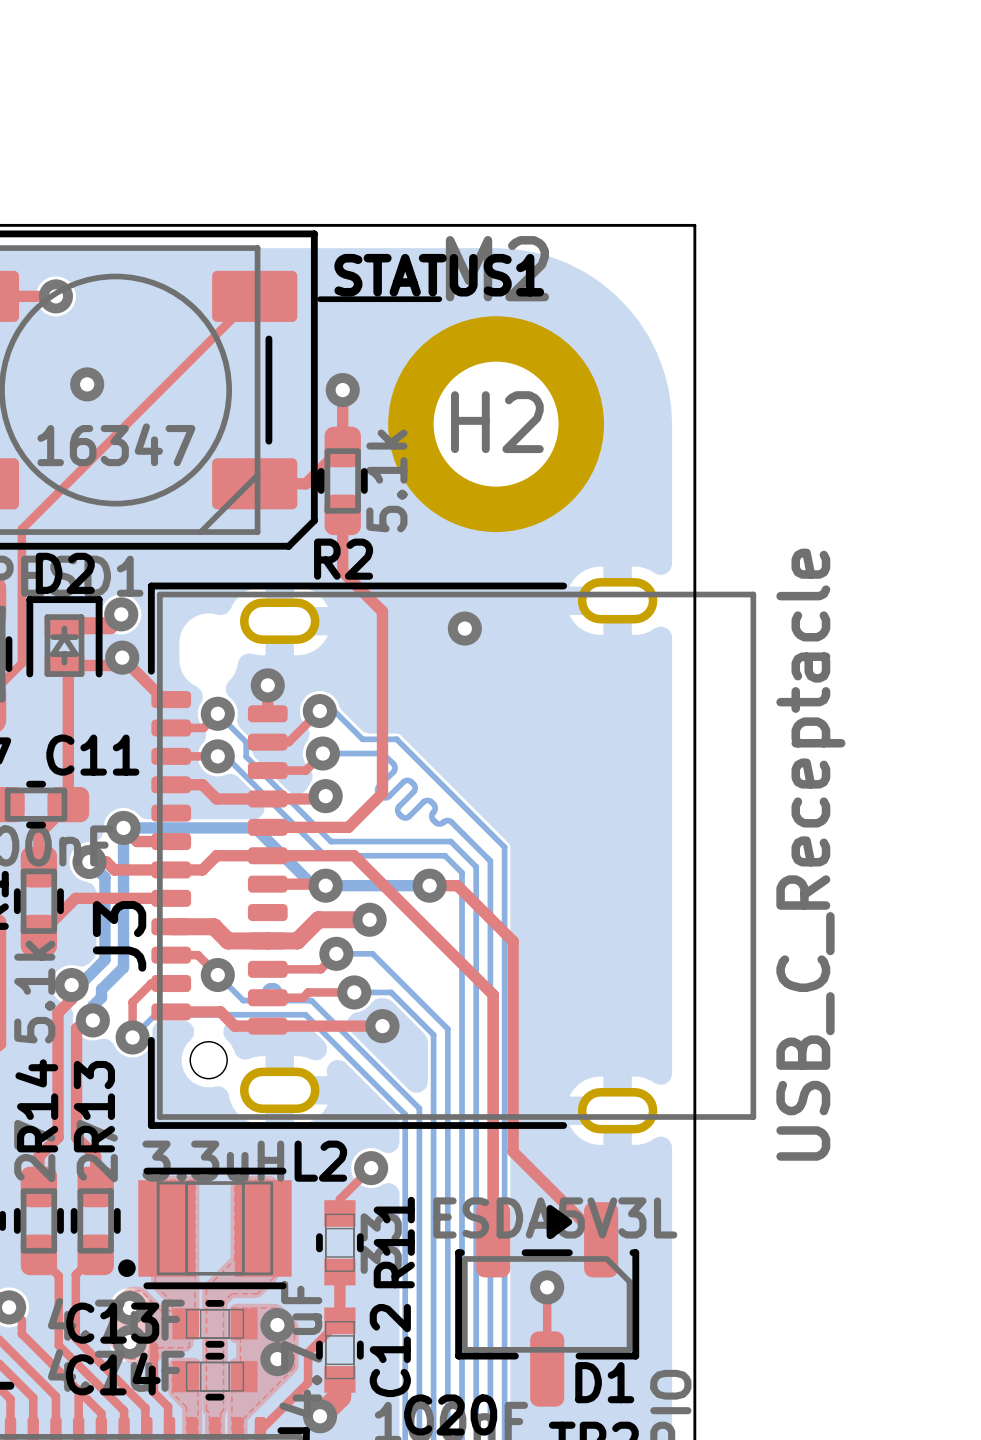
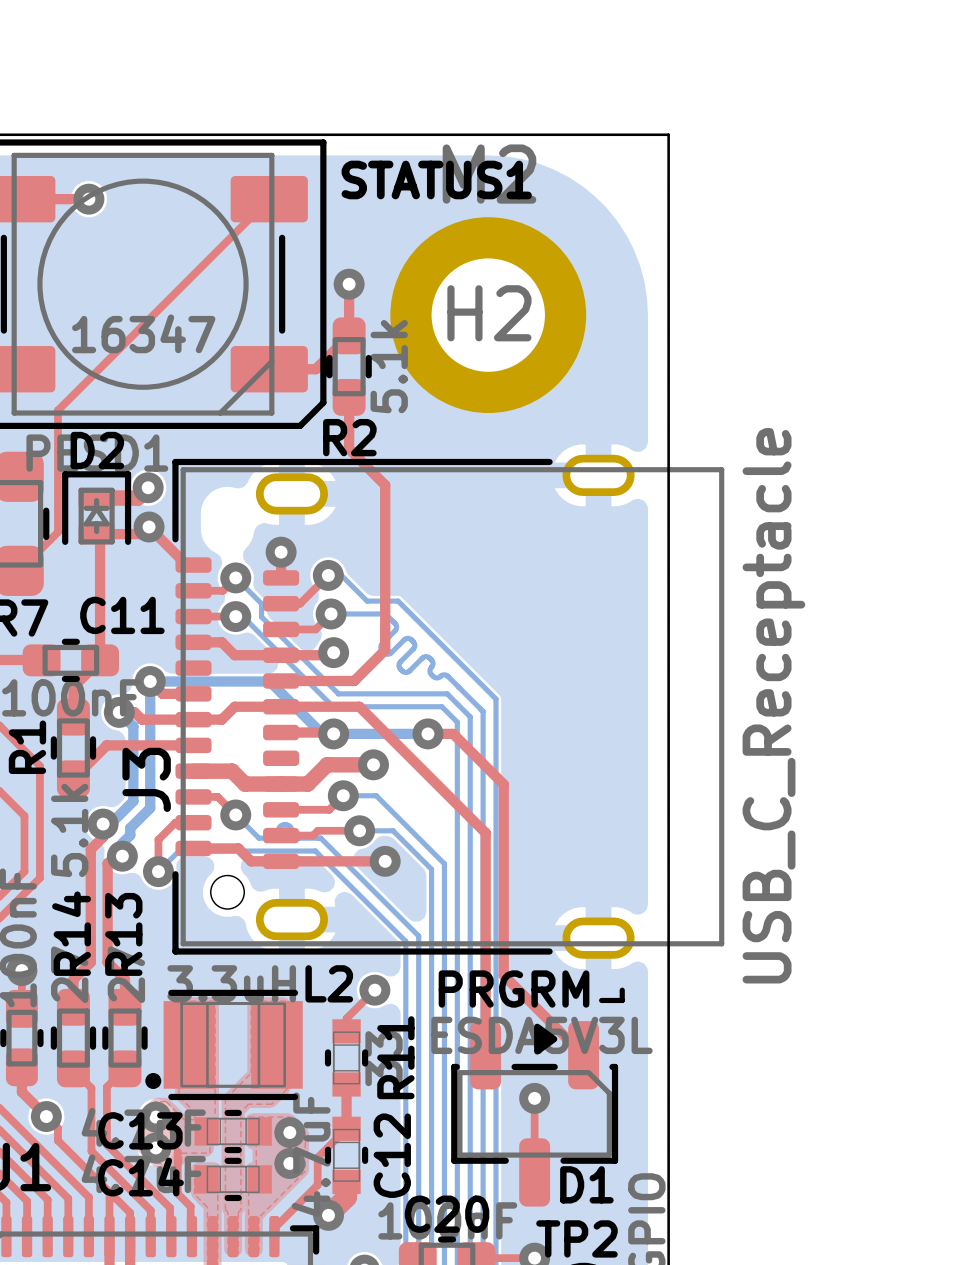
line: (320, 299) (439, 299) -> none
via: (87, 384) -> none
via: (464, 628) -> none
text: none -> PRGRM (514, 989)
line: none -> (622, 990) (622, 1000) (601, 1000)

